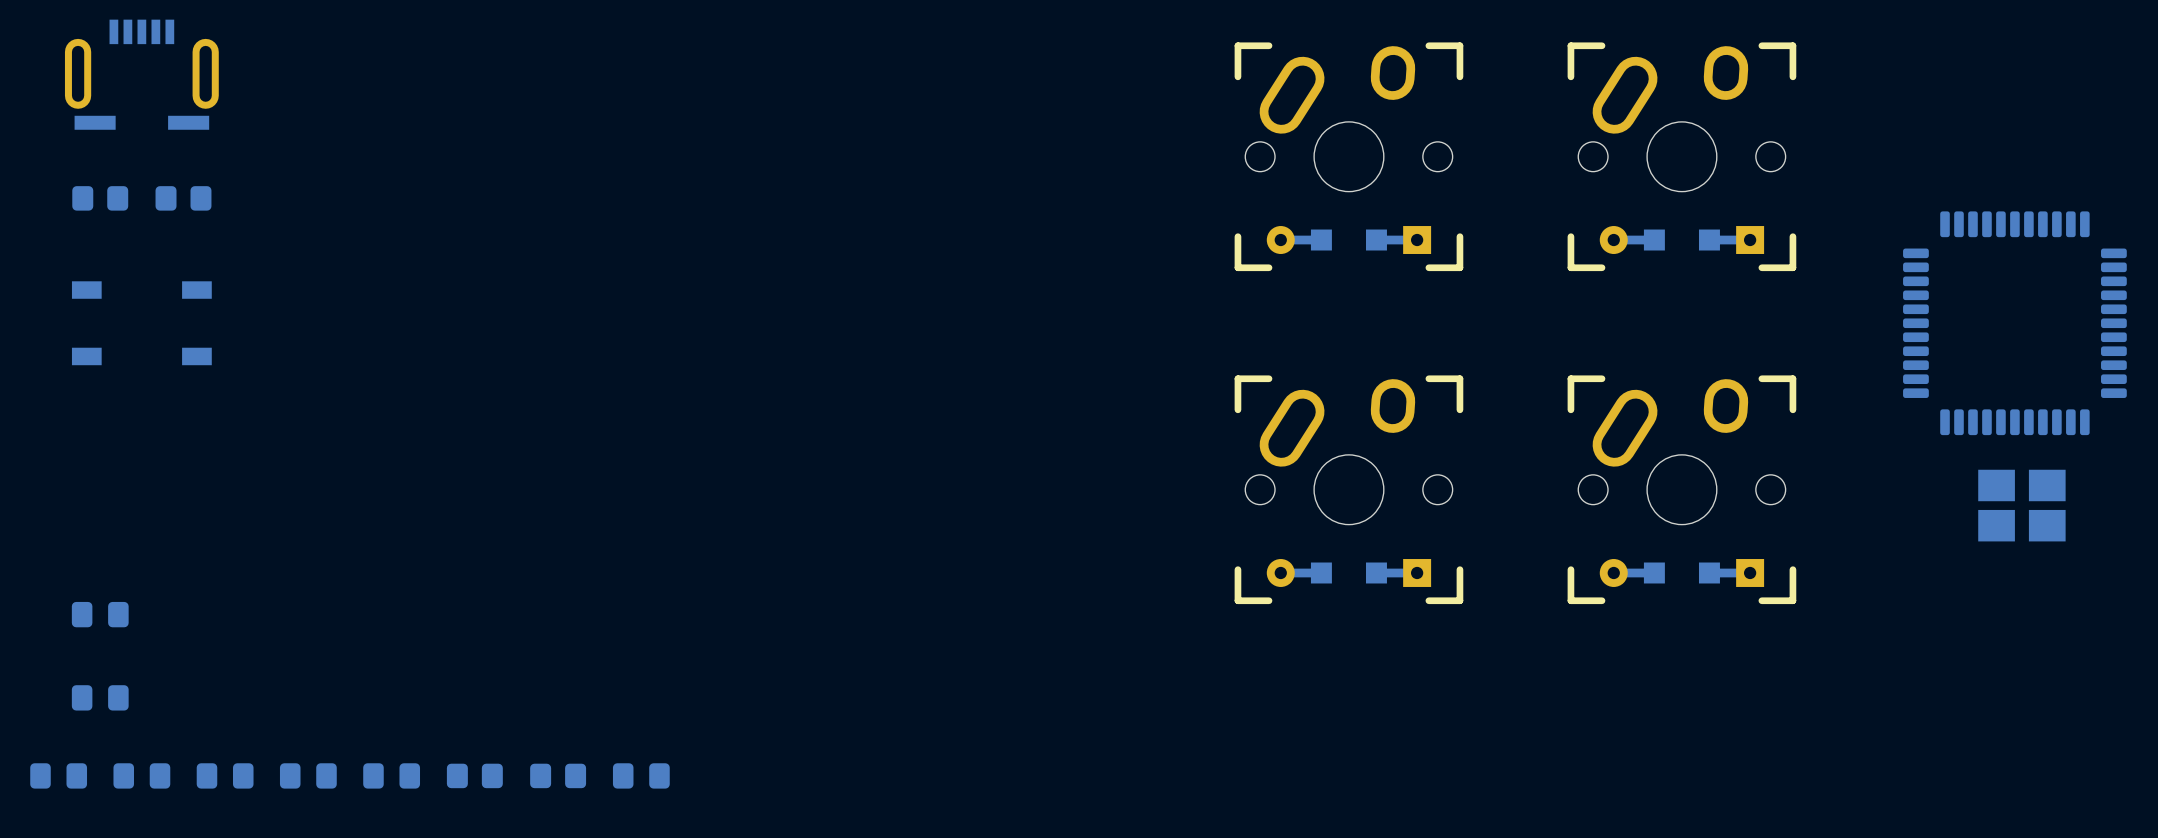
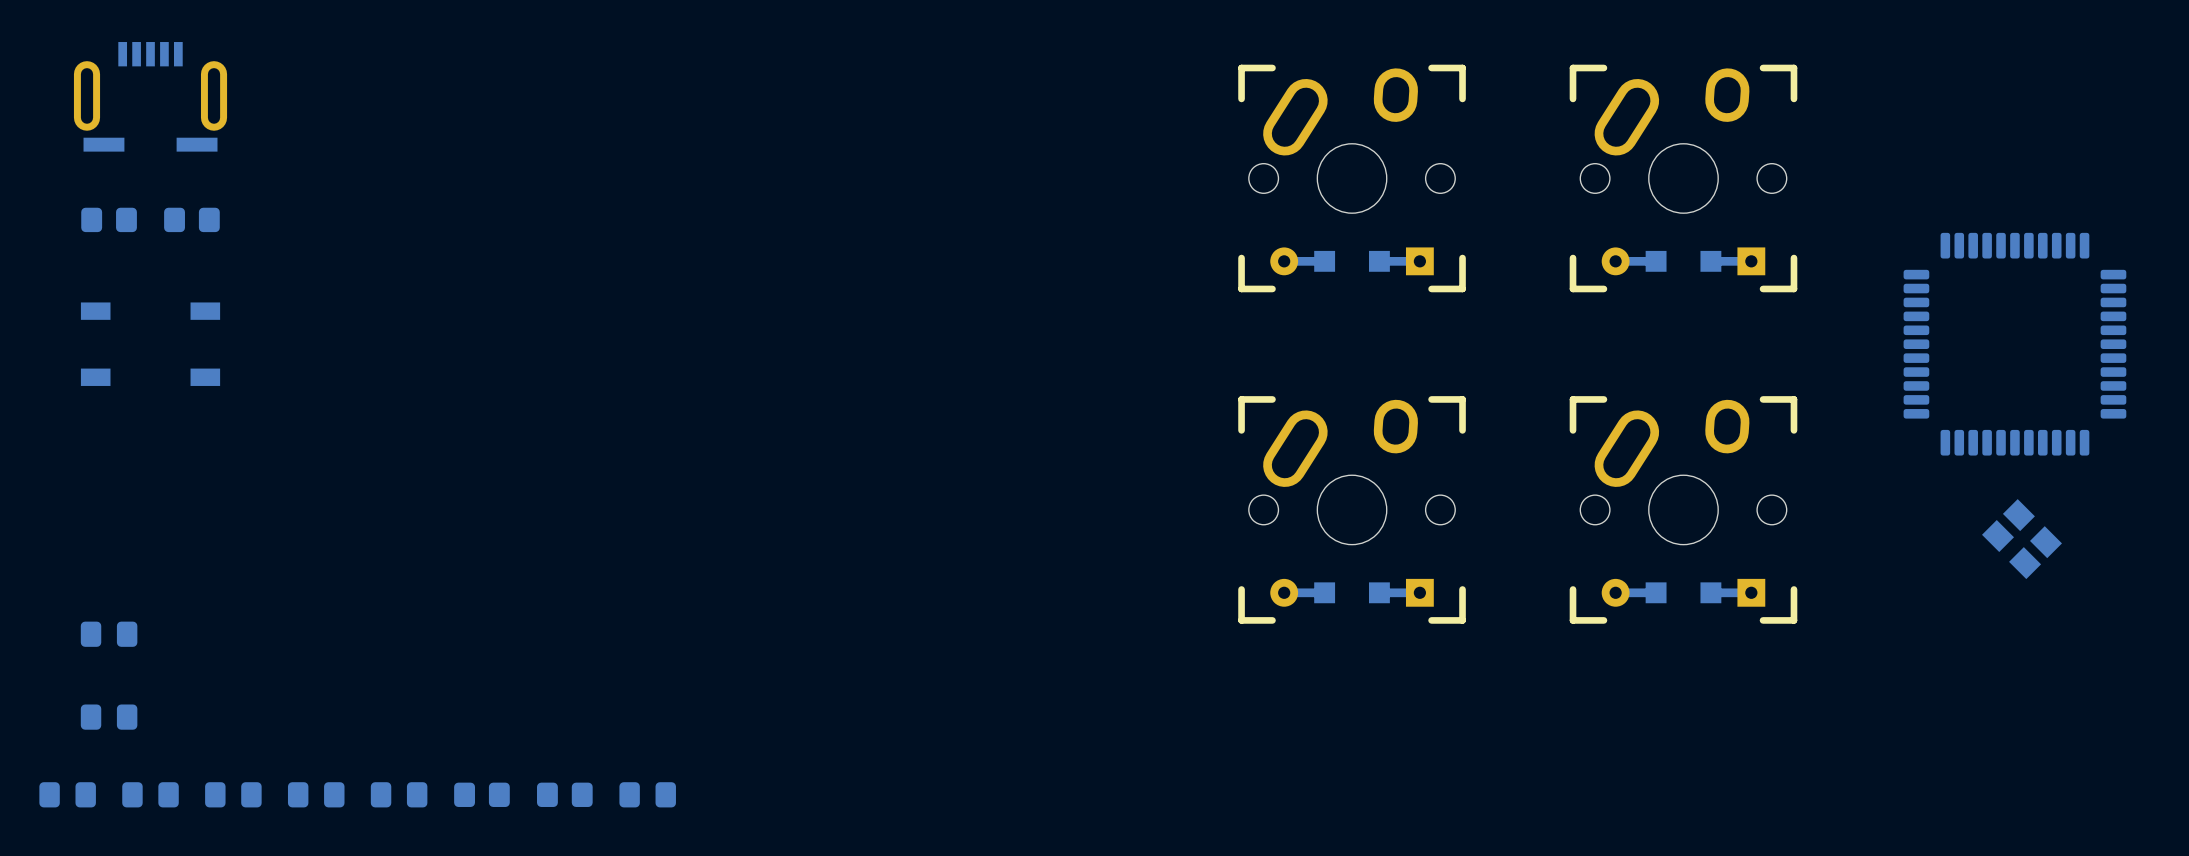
part footprint: [1978, 469, 2066, 542] -> [1982, 499, 2062, 580]

